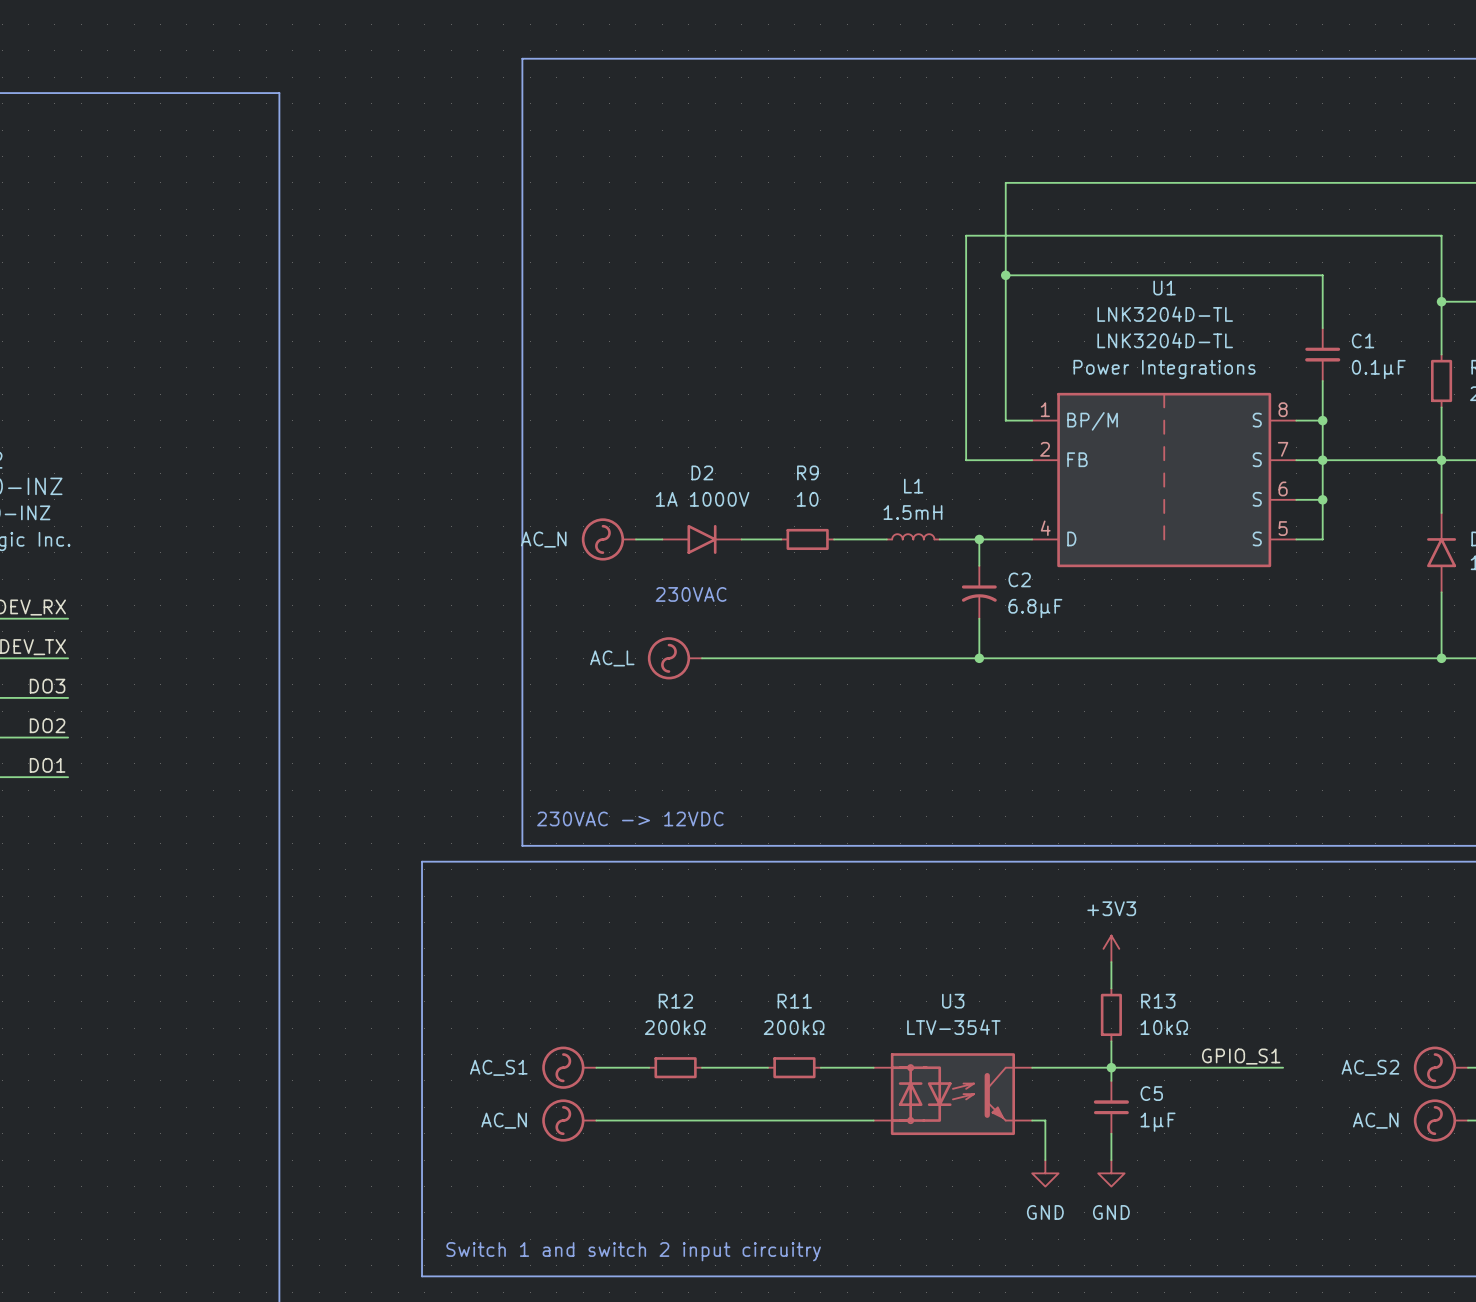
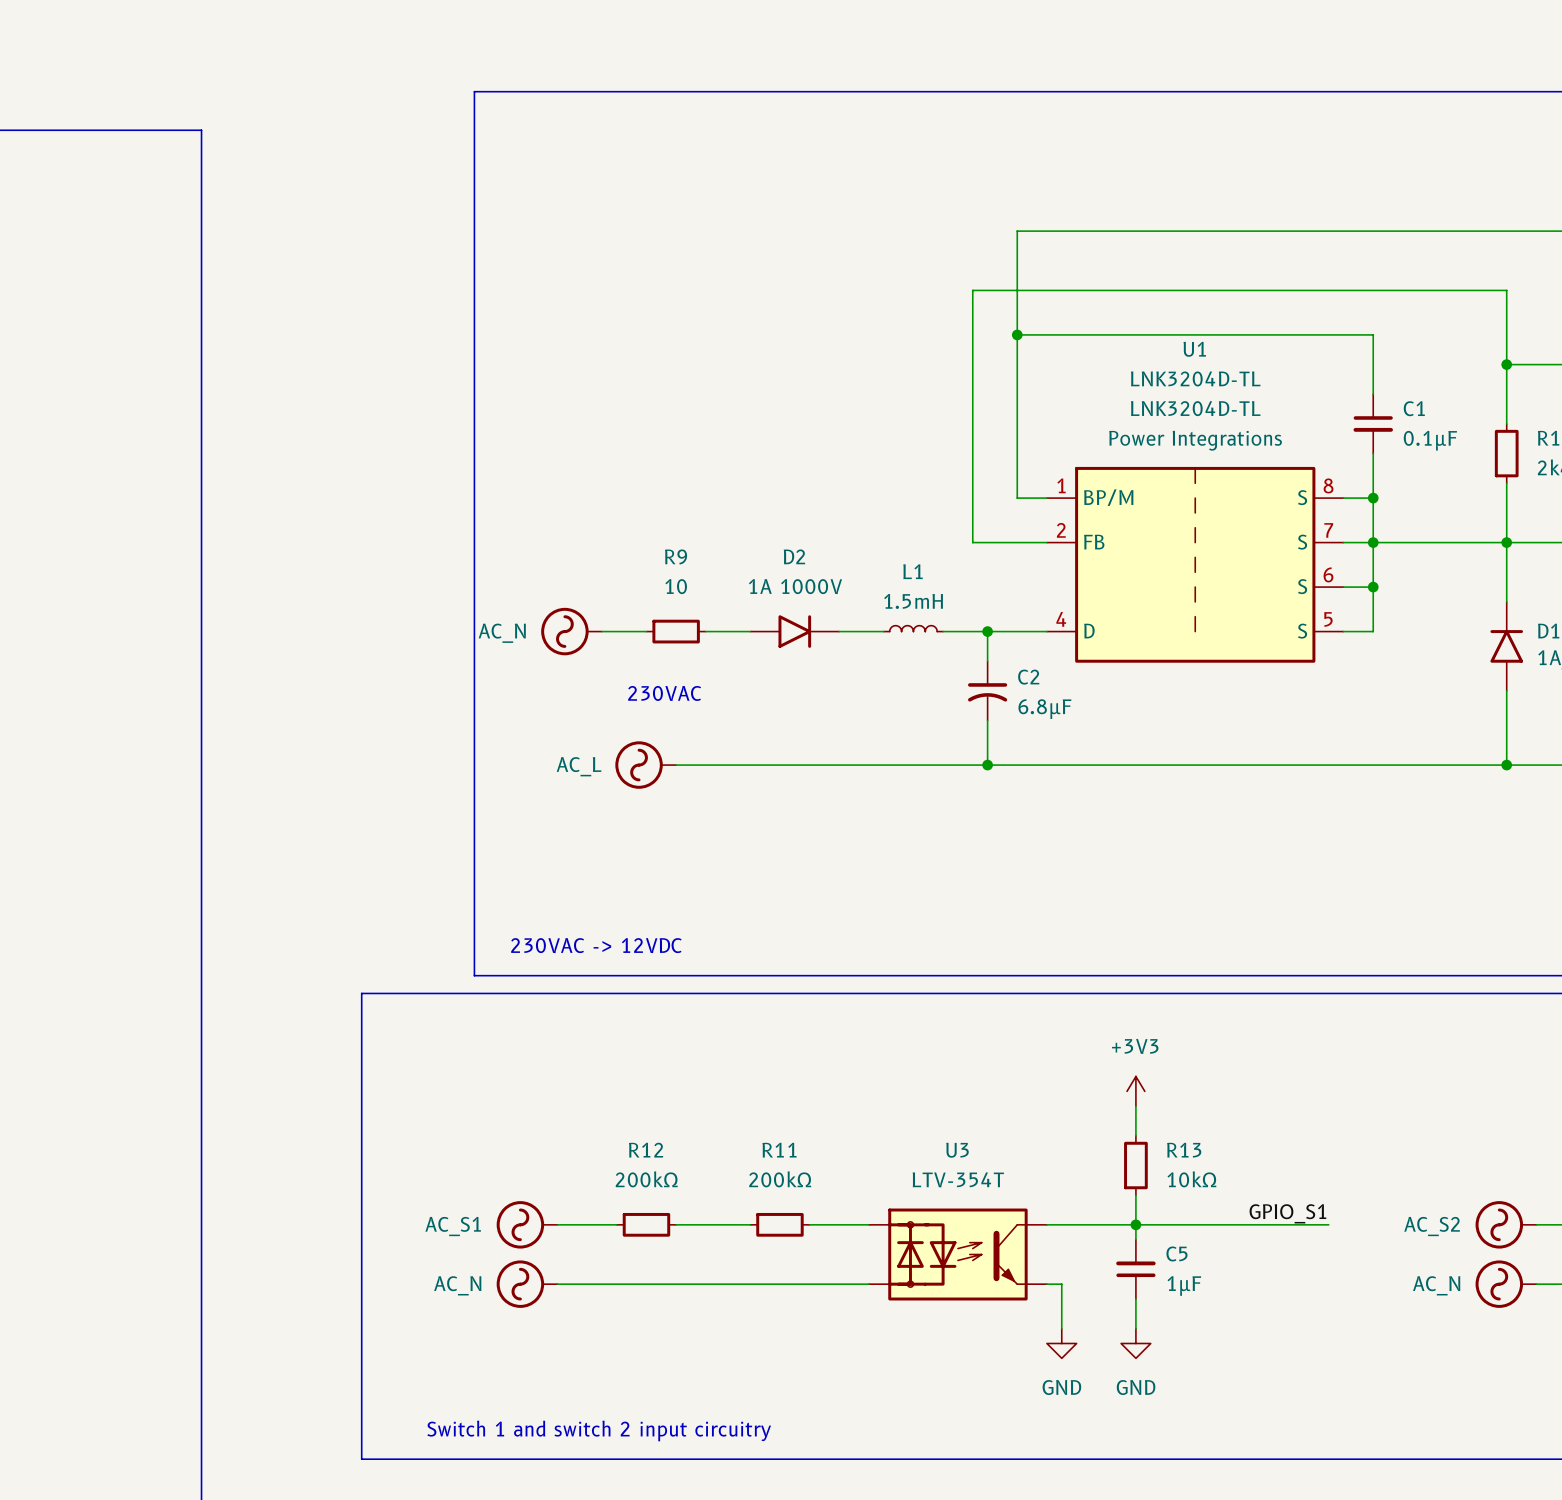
D2 position: (702, 539) -> (794, 631)
R9 position: (807, 539) -> (676, 631)

